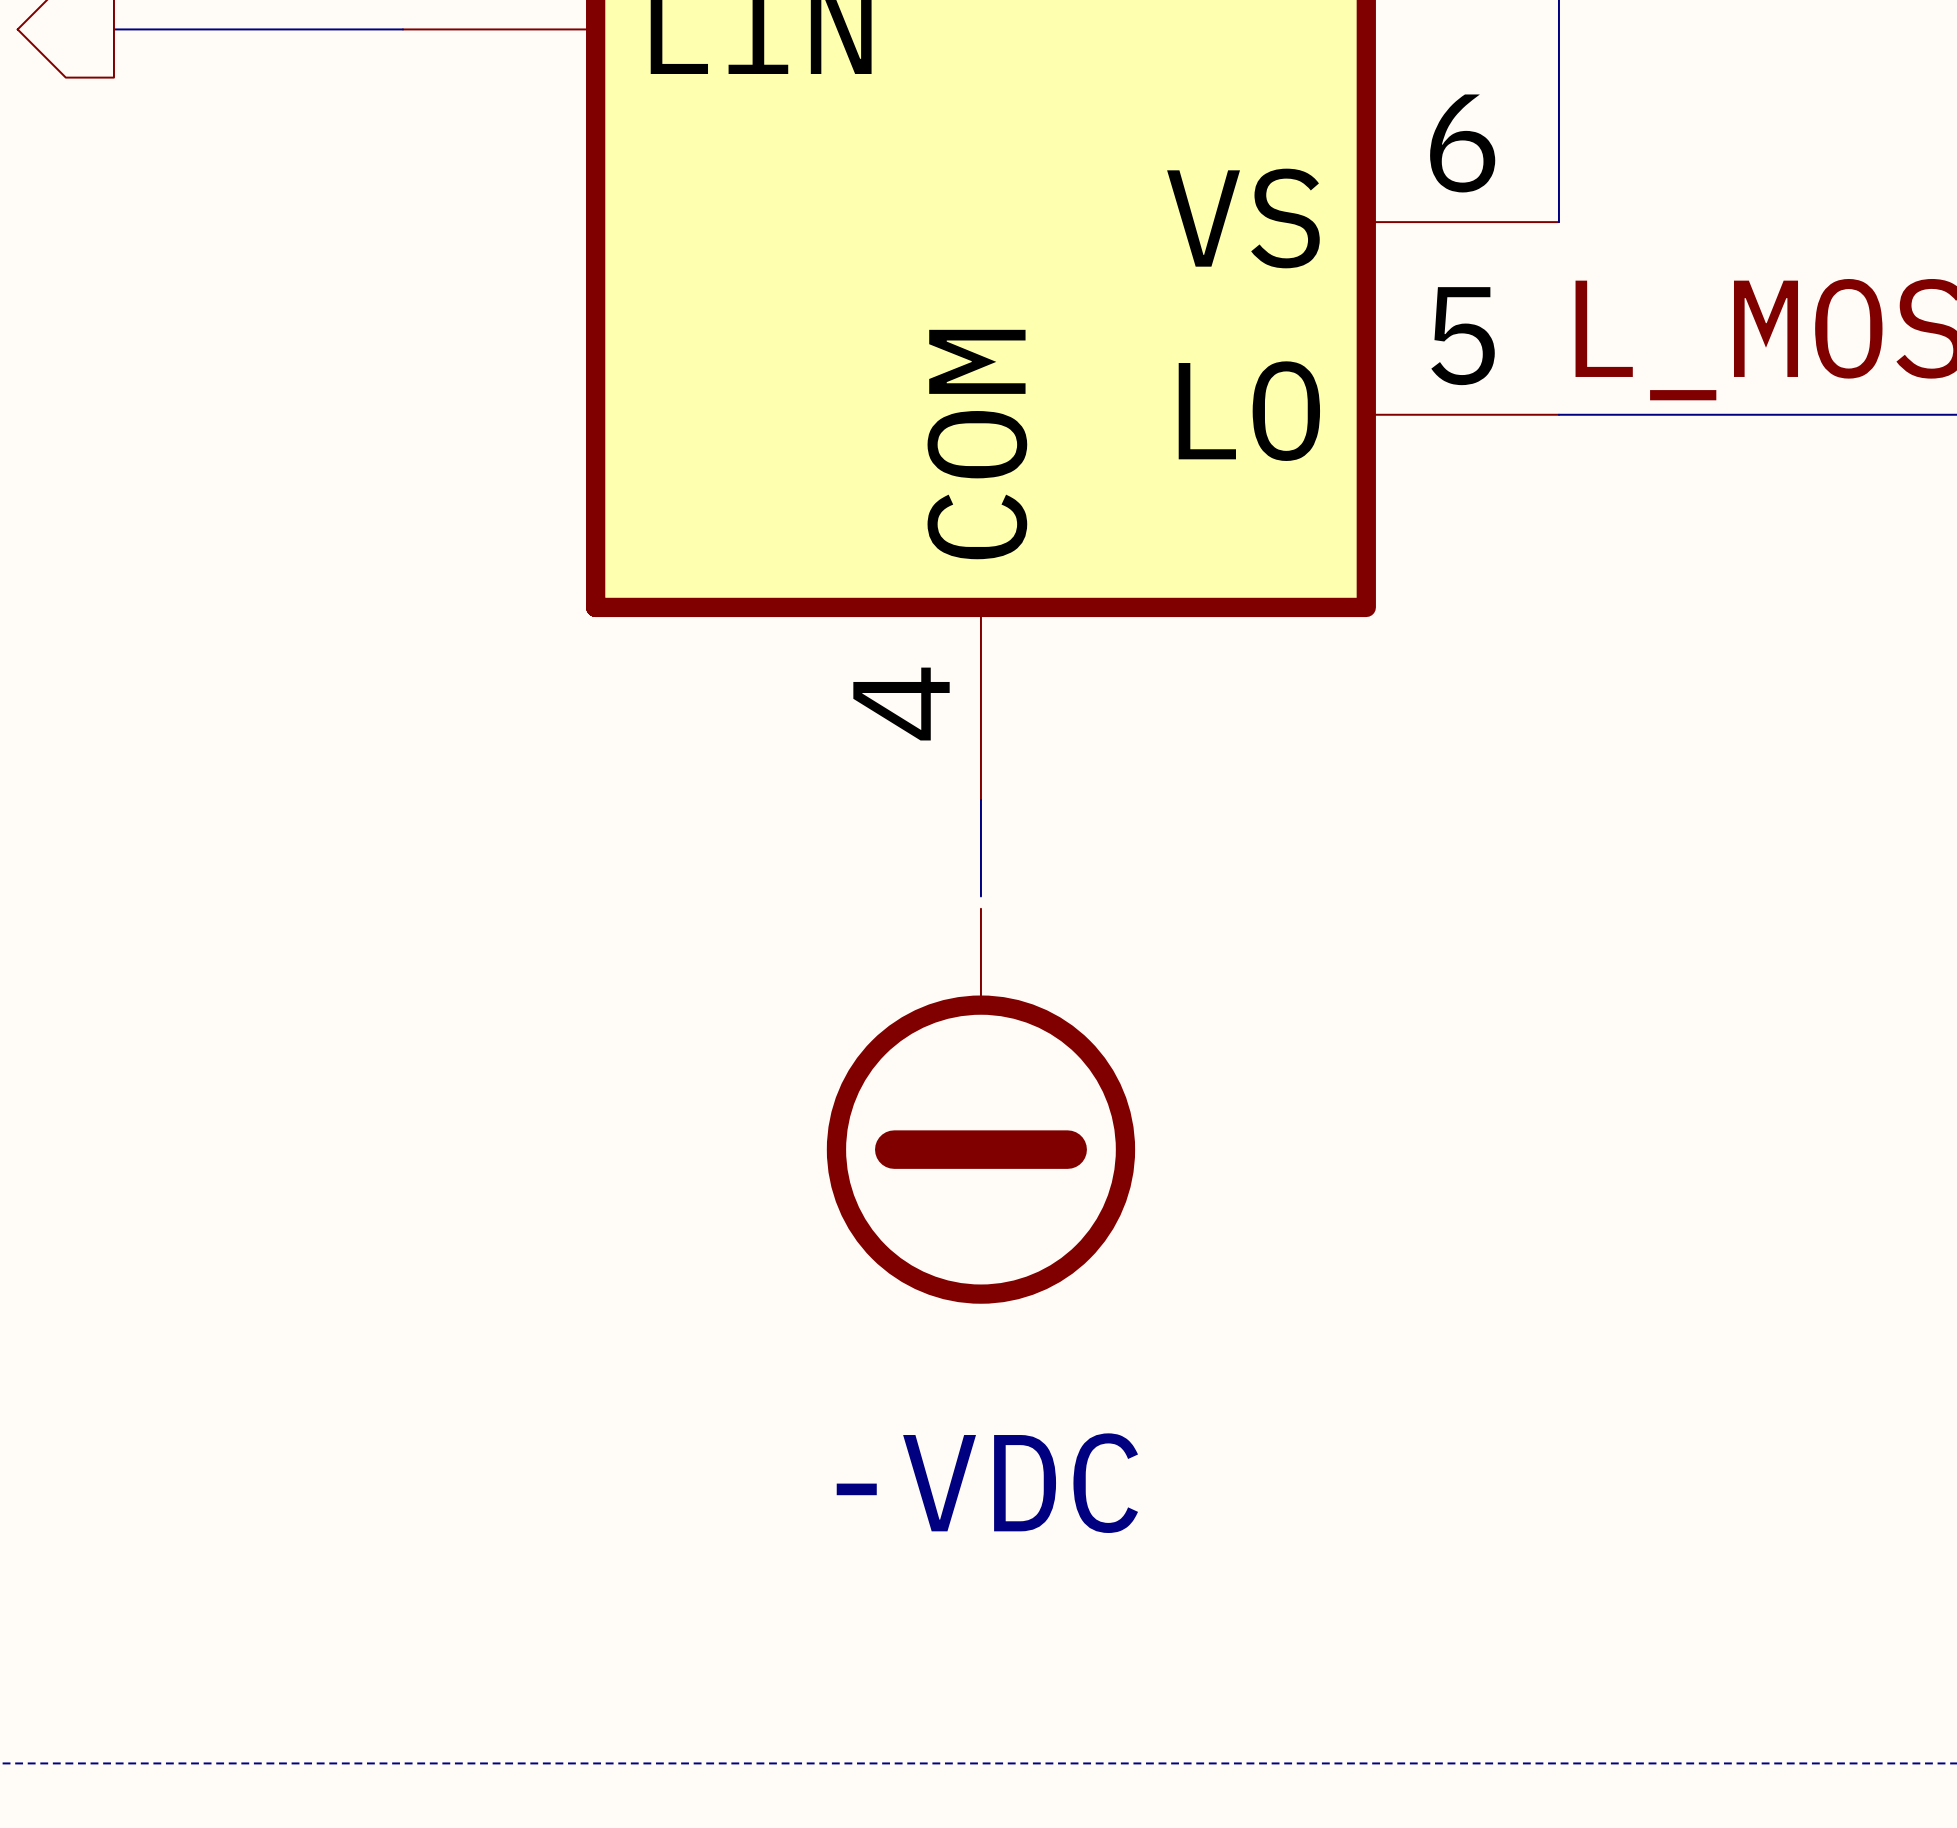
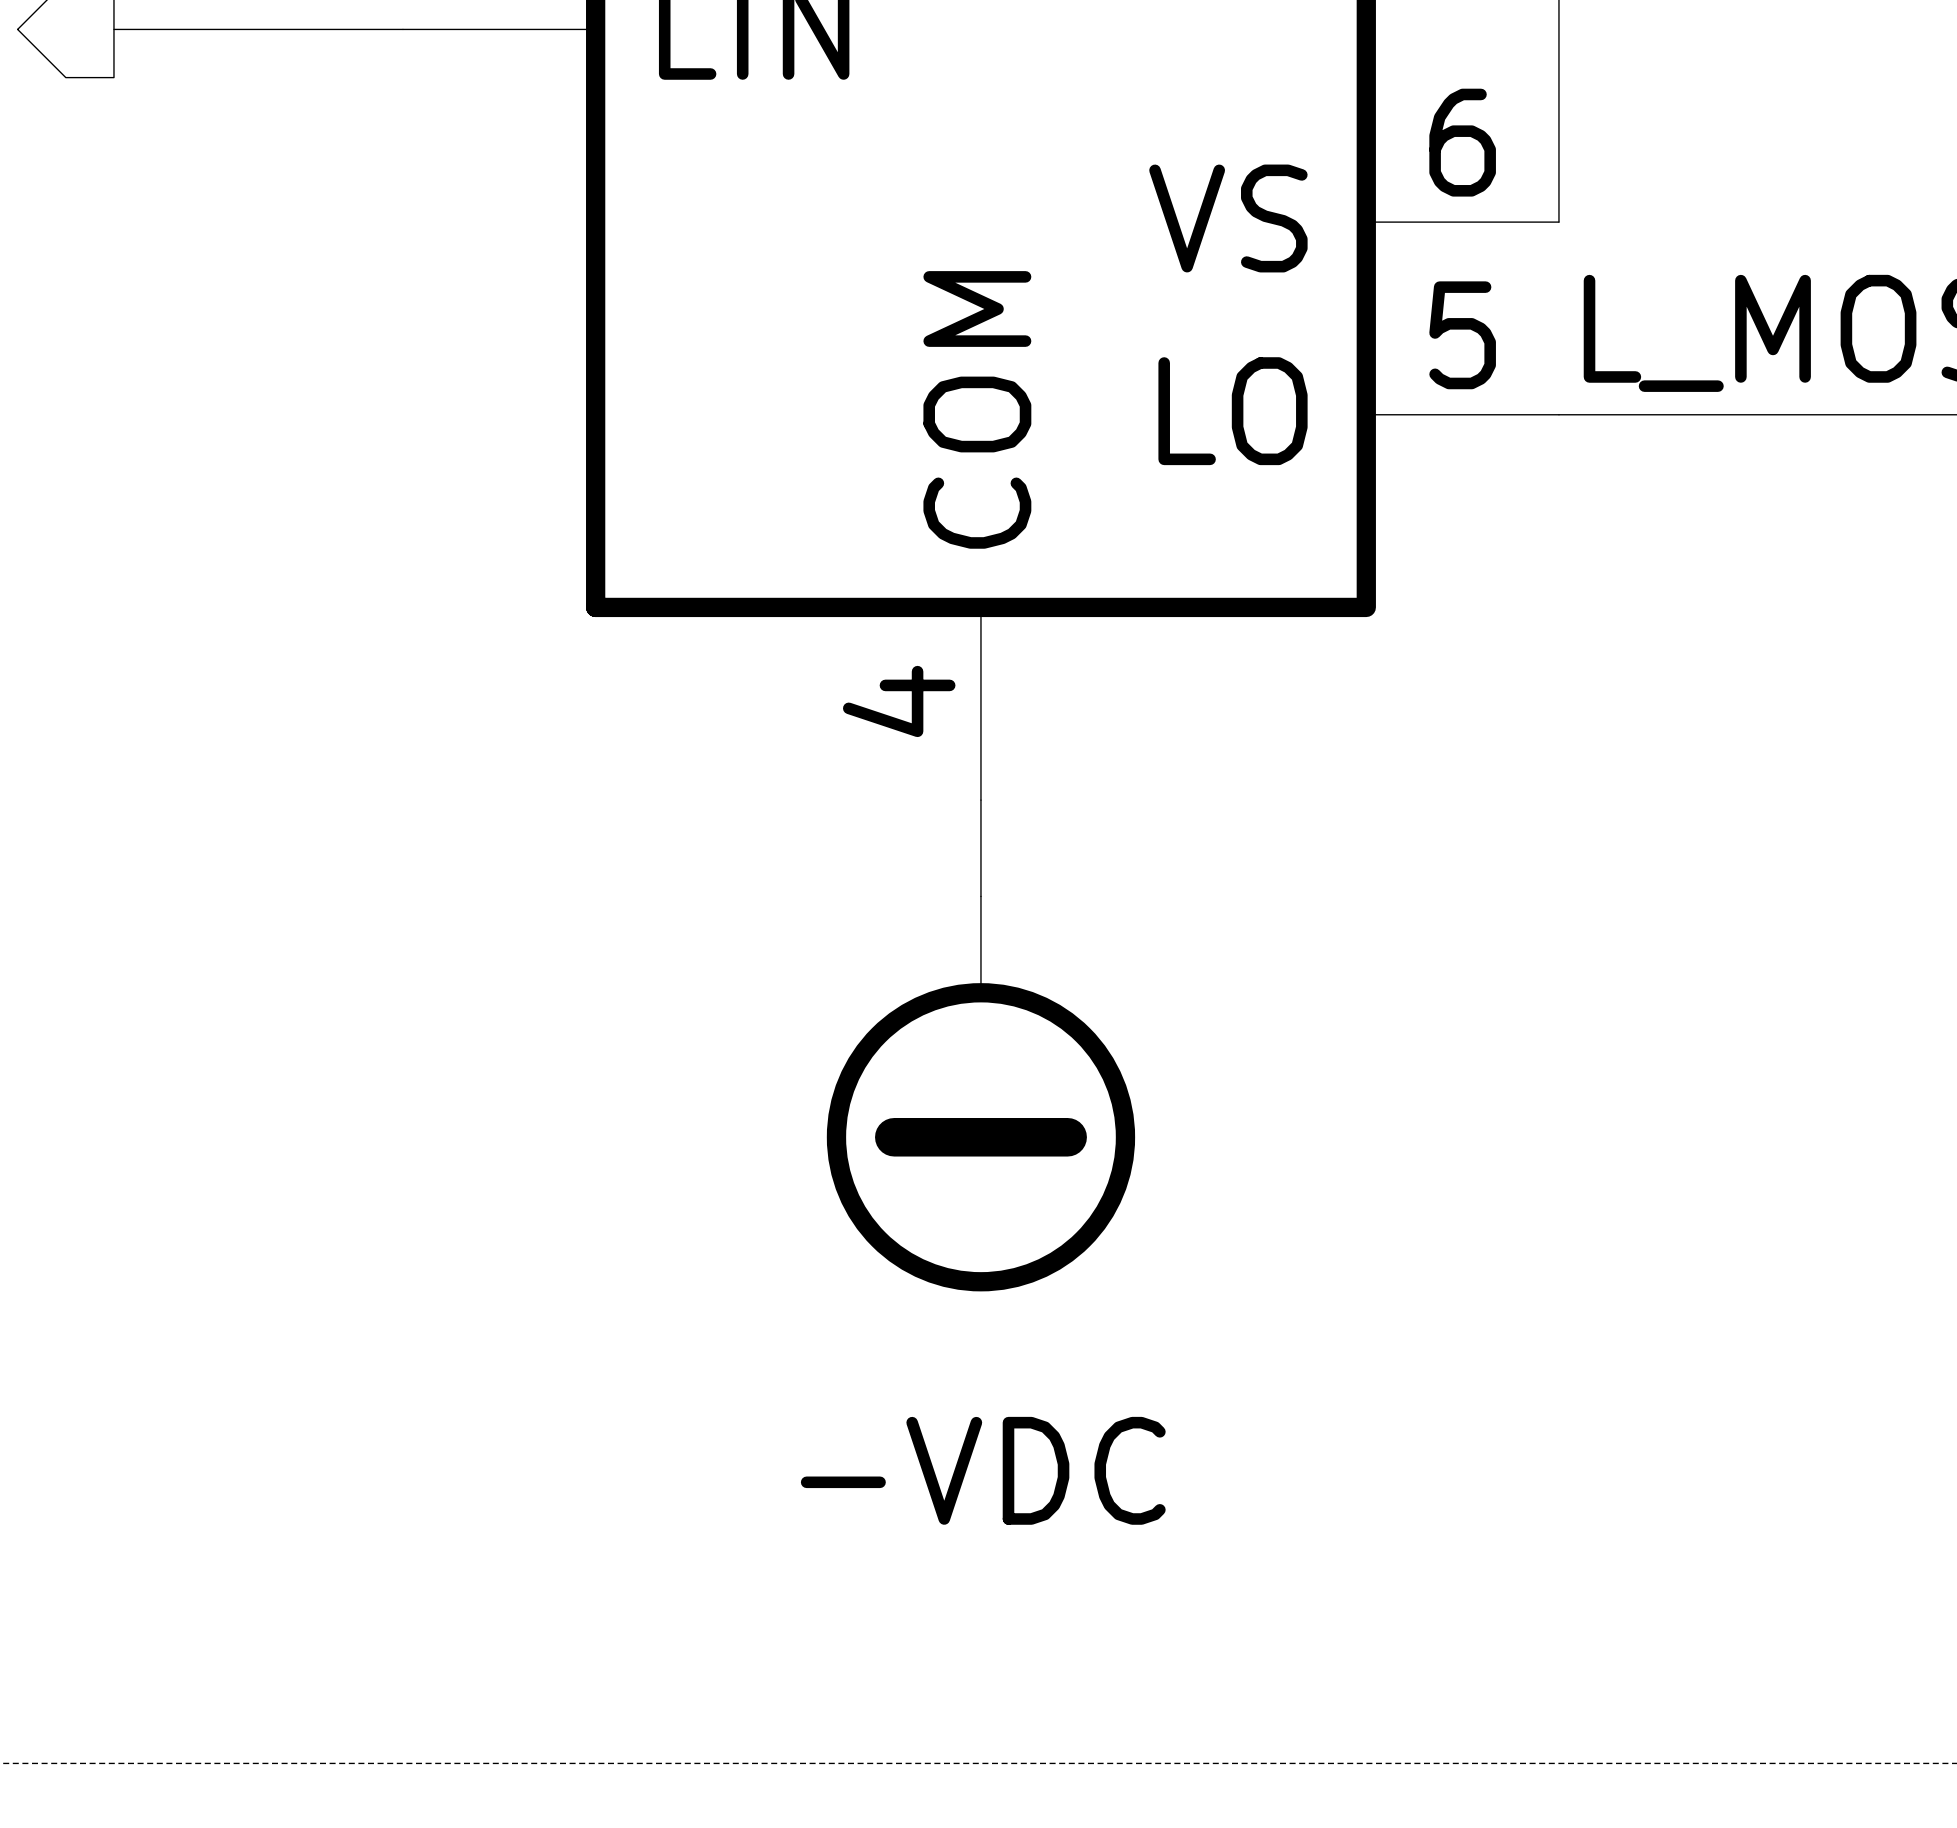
power symbol position: -VDC (980, 1106) -> -VDC (980, 1093)

